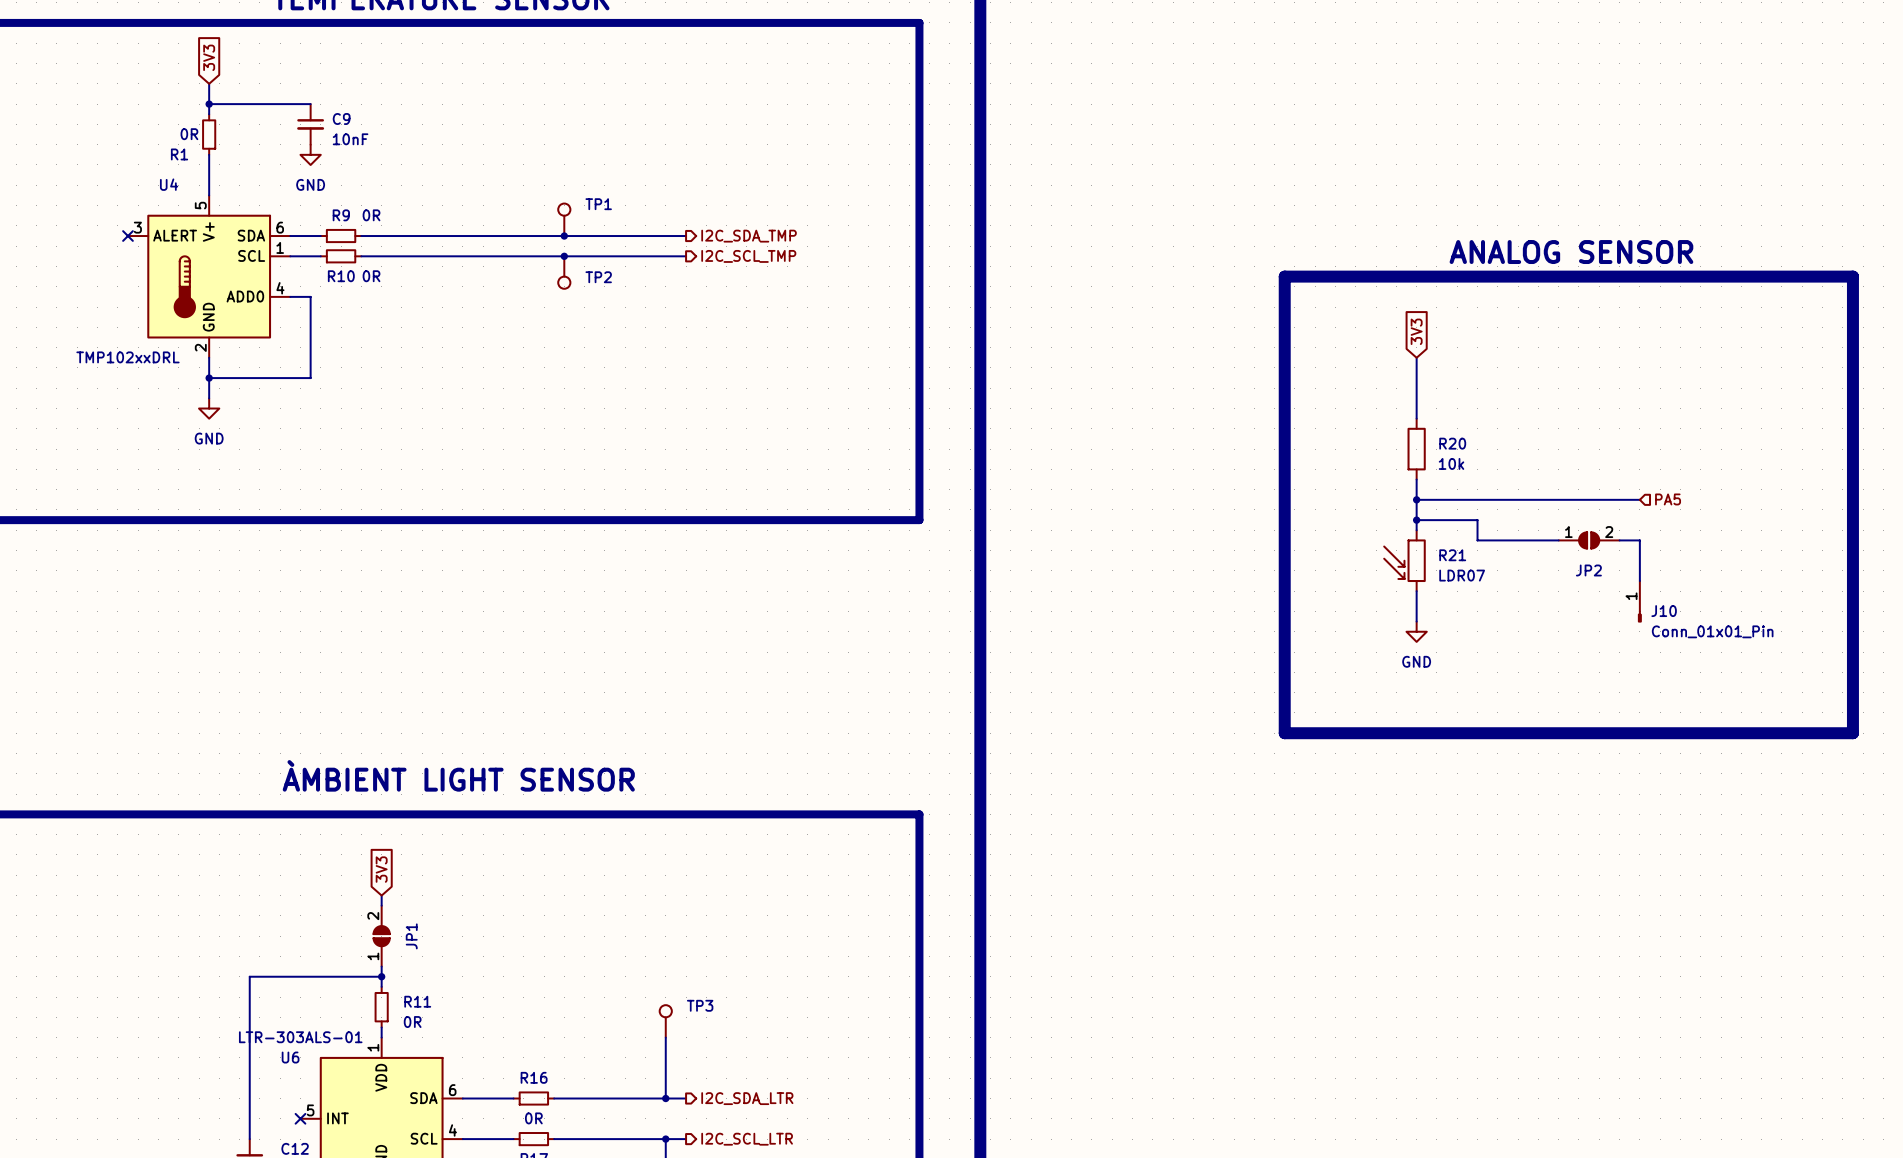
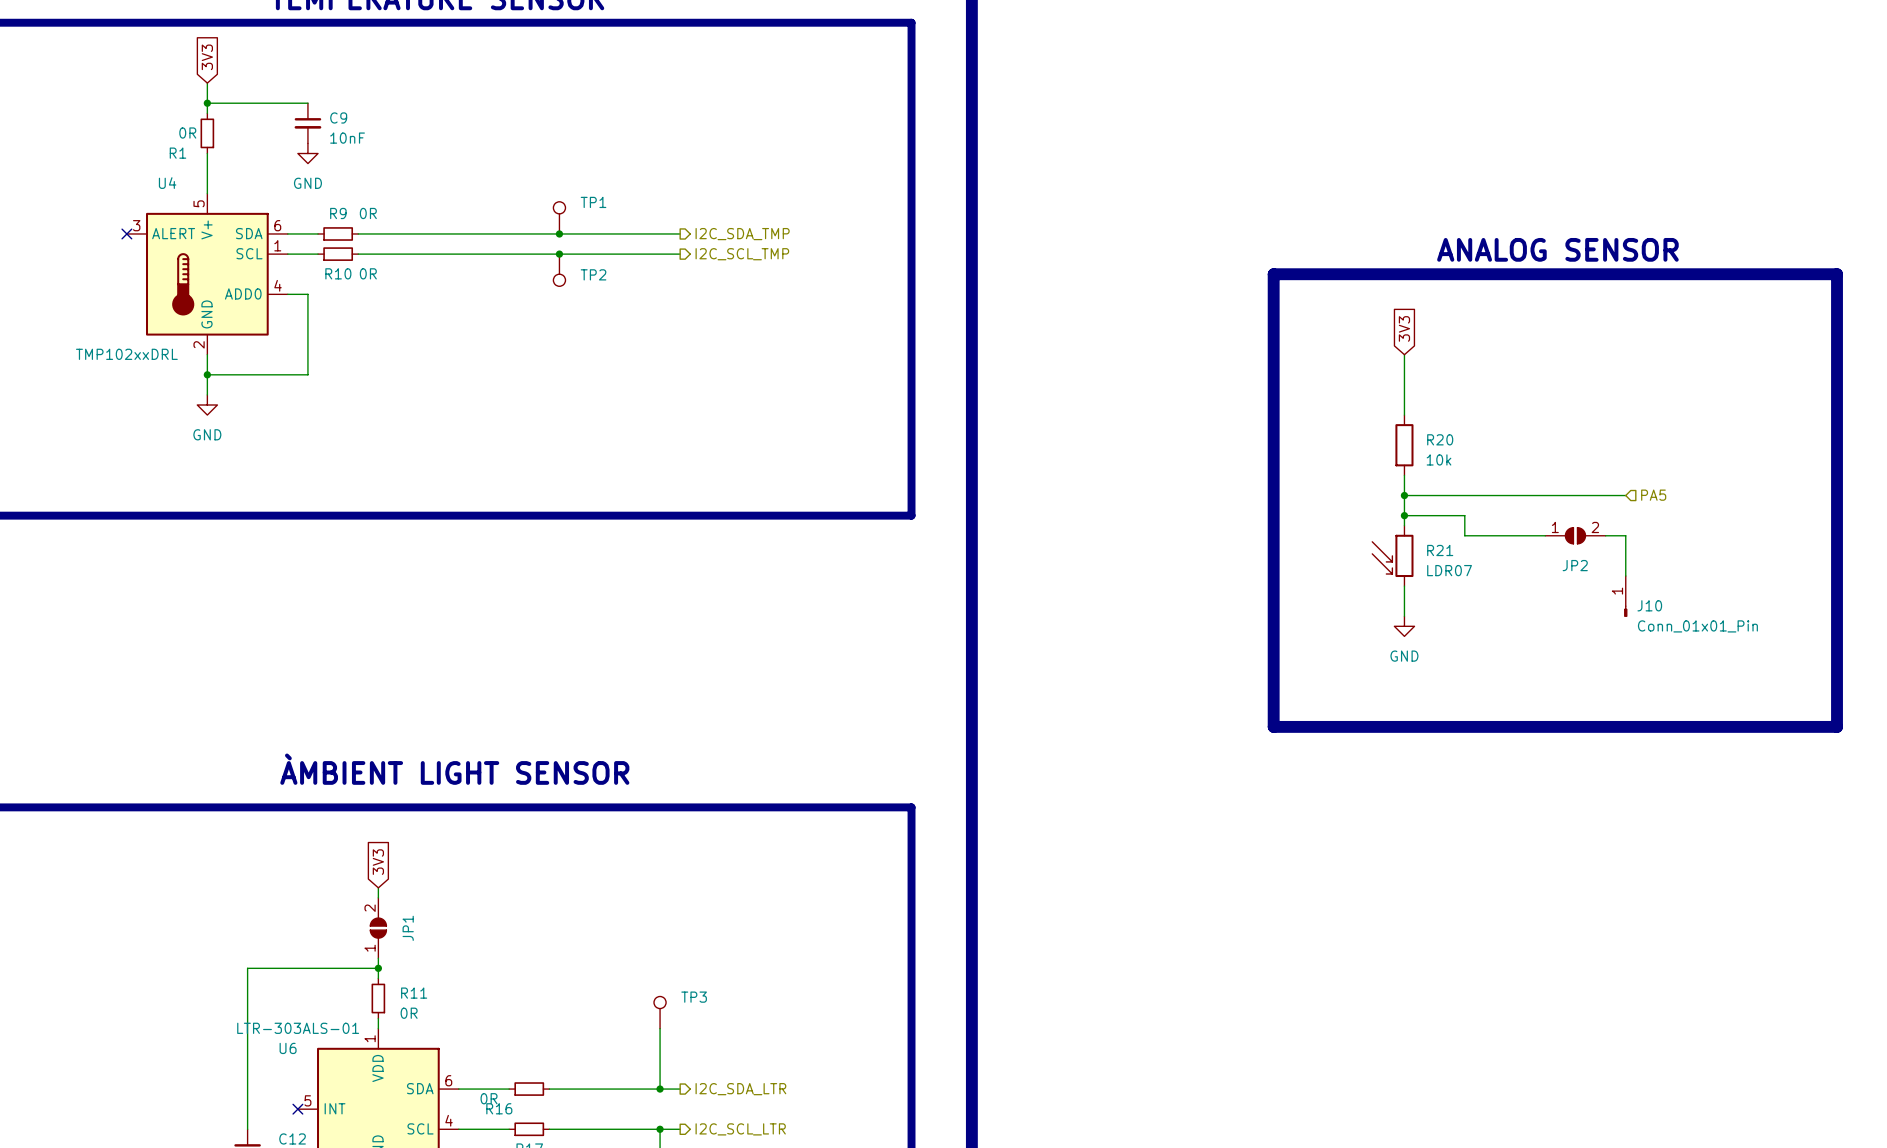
R16 name position: R16 (534, 1077) -> R16 (499, 1108)
R16 value position: 0R (533, 1118) -> 0R (489, 1098)

